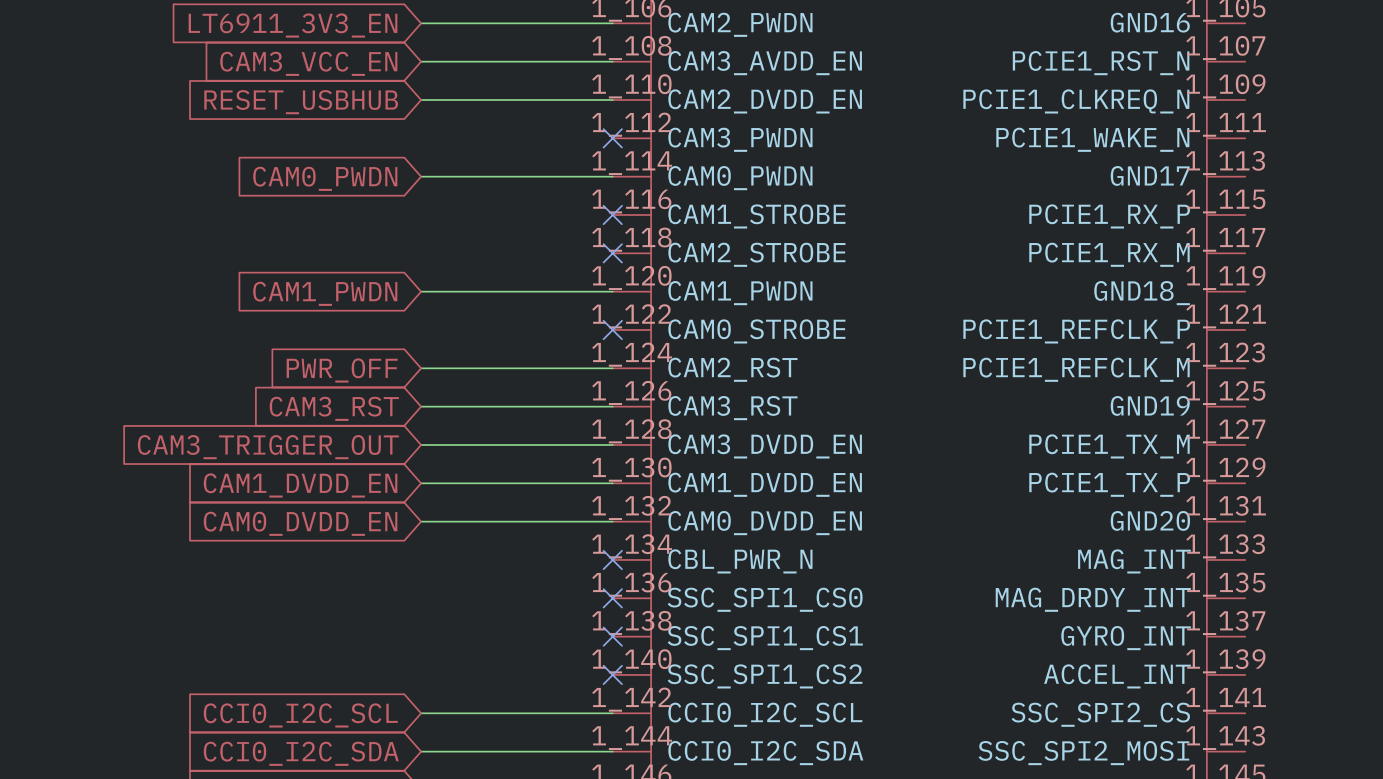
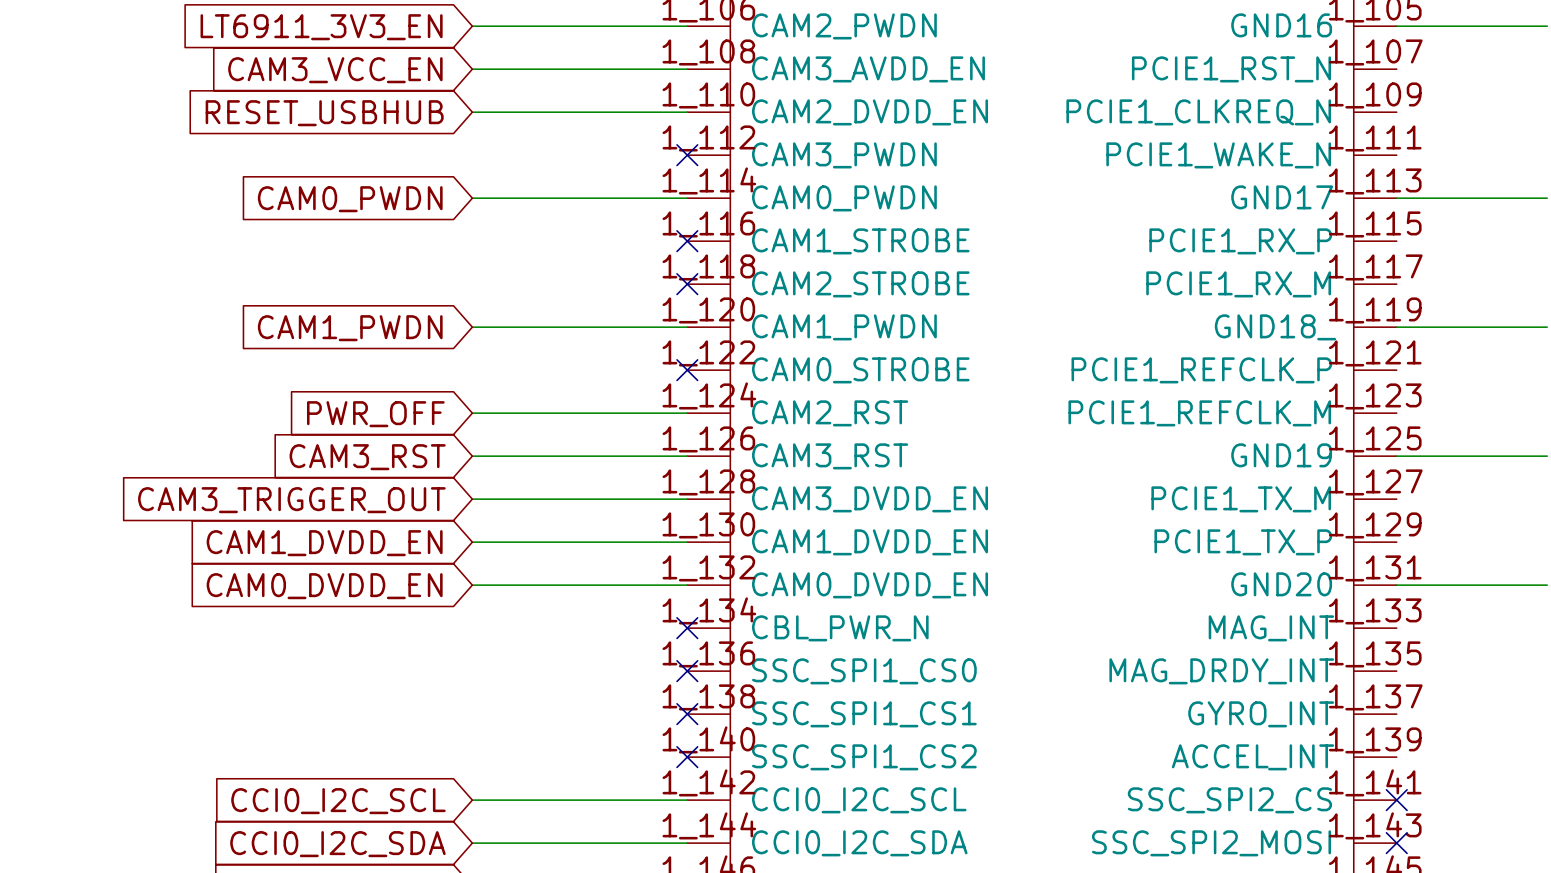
wire: none -> (1396, 26) (1547, 26)
wire: none -> (1396, 198) (1547, 198)
wire: none -> (1396, 327) (1547, 327)
wire: none -> (1396, 456) (1547, 456)
wire: none -> (1396, 585) (1547, 585)
no-connect mark: none -> (1396, 800)
no-connect mark: none -> (1396, 843)

